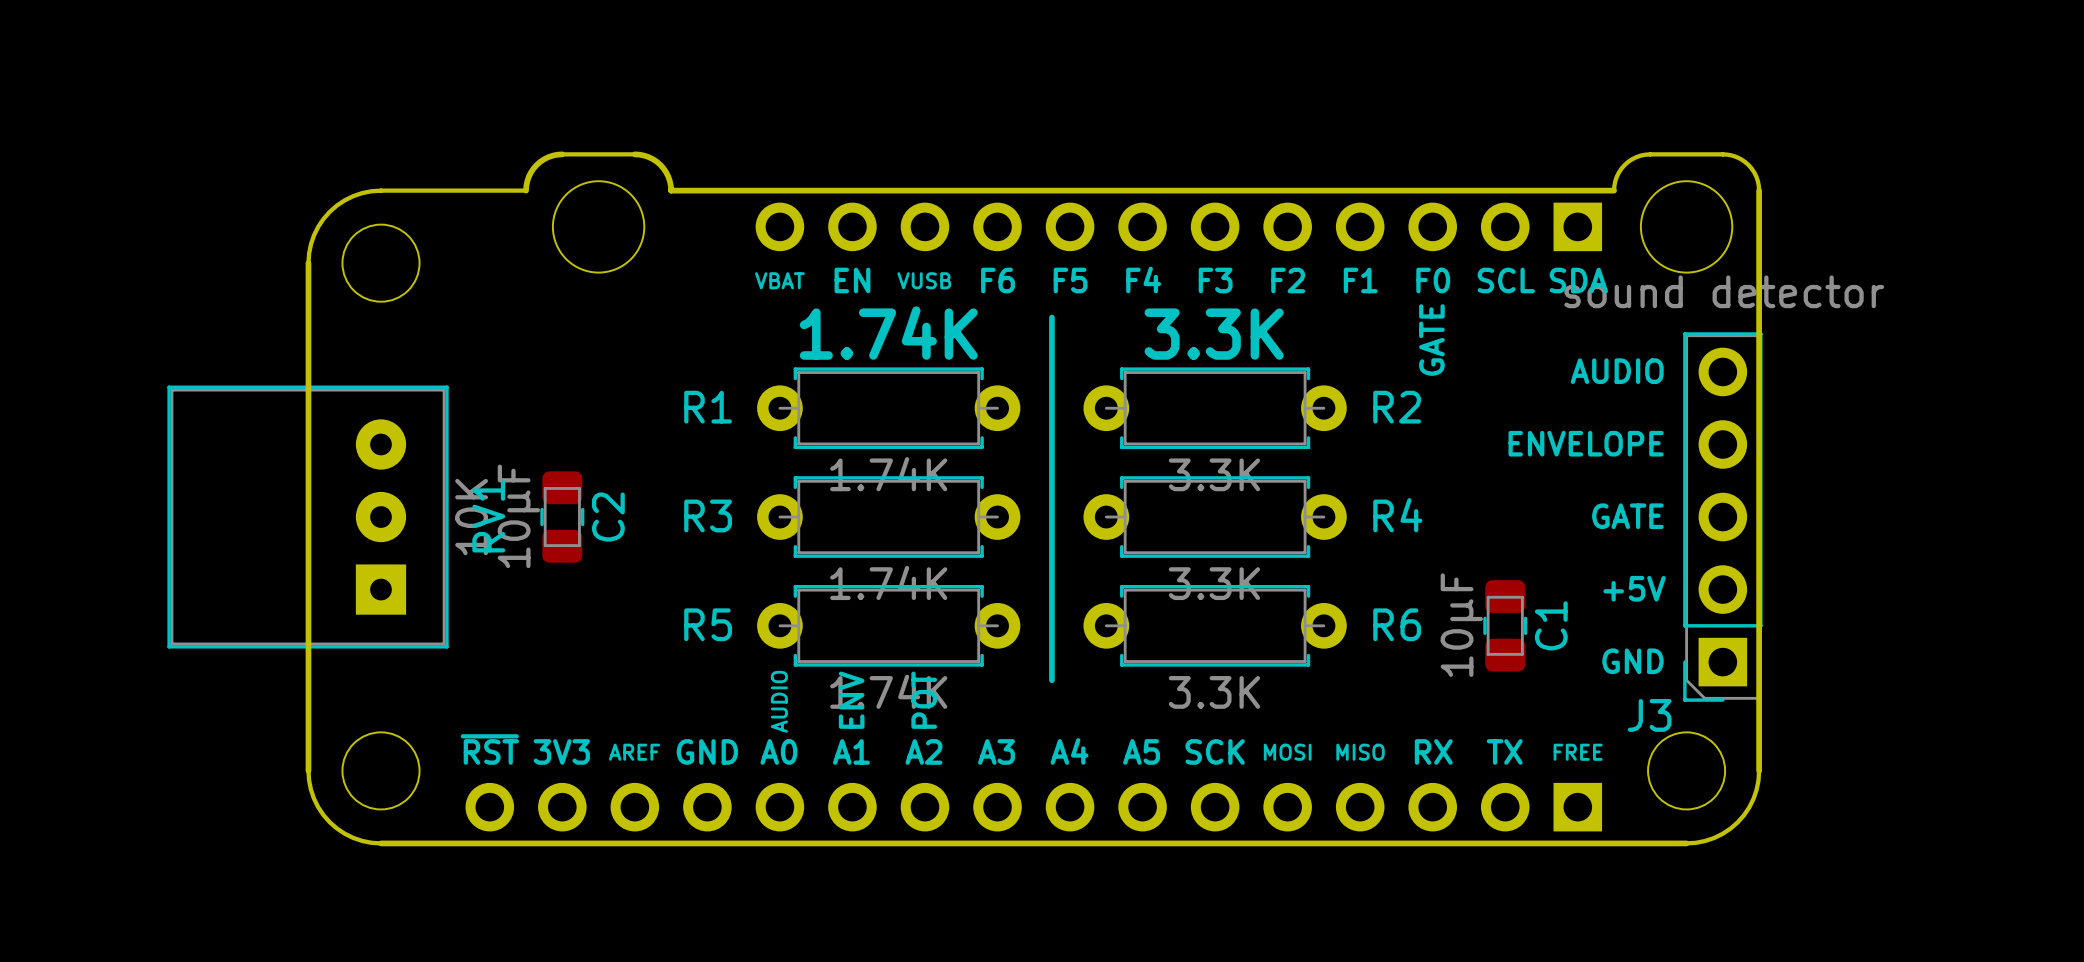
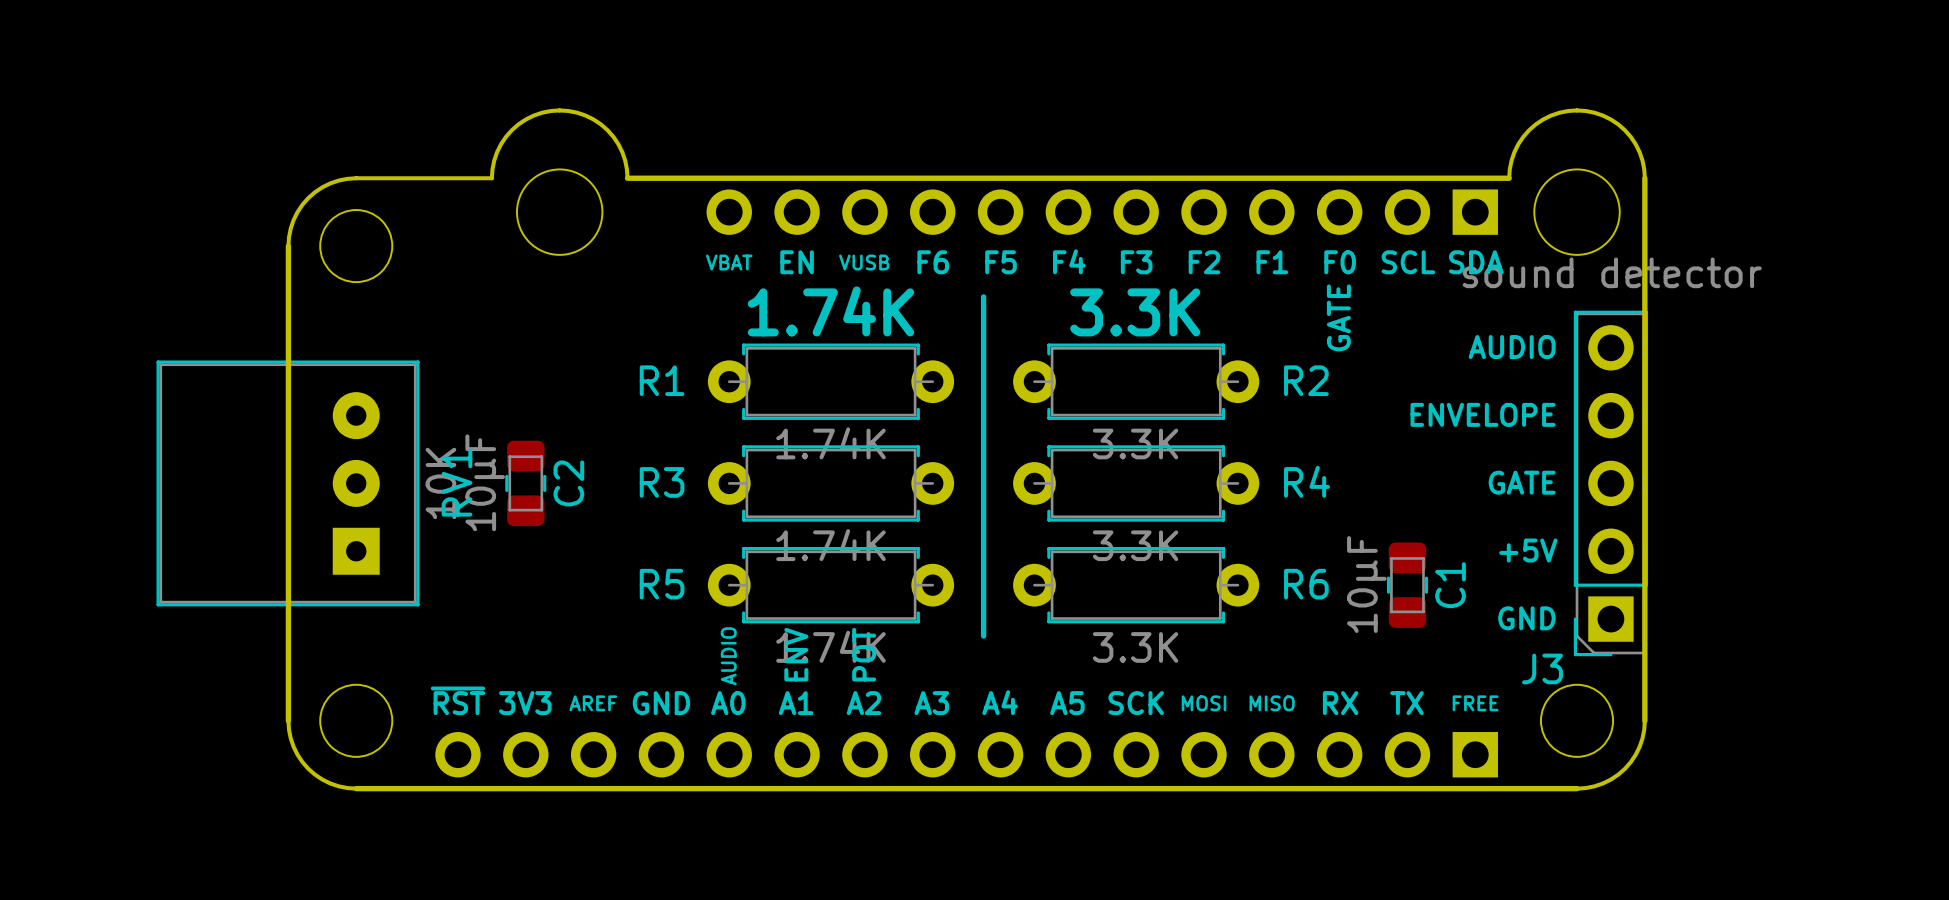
board edge: (526, 190) (528, 176) (536, 164) (548, 157) (562, 154) (644, 155) (652, 159) (663, 168) (669, 181) (671, 190) -> (491, 178) (497, 152) (511, 130) (533, 115) (559, 110) (585, 115) (607, 130) (622, 152) (627, 178)
board edge: (1614, 190) (1616, 176) (1624, 164) (1636, 157) (1650, 154) (1732, 155) (1740, 159) (1751, 168) (1757, 181) (1759, 190) -> (1509, 178) (1514, 152) (1529, 130) (1551, 115) (1577, 110) (1602, 115) (1624, 130) (1639, 152) (1644, 178)

